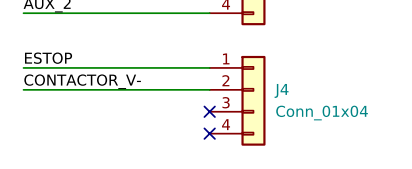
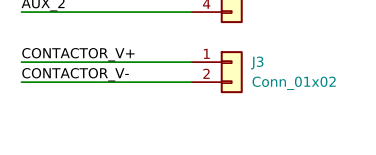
label: ESTOP (48, 58) -> CONTACTOR_V+ (78, 54)
J3: none -> Conn_01x02 (217, 72)
J4: Conn_01x04 (237, 100) -> none
no-connect mark: (209, 111) -> none
no-connect mark: (209, 133) -> none

